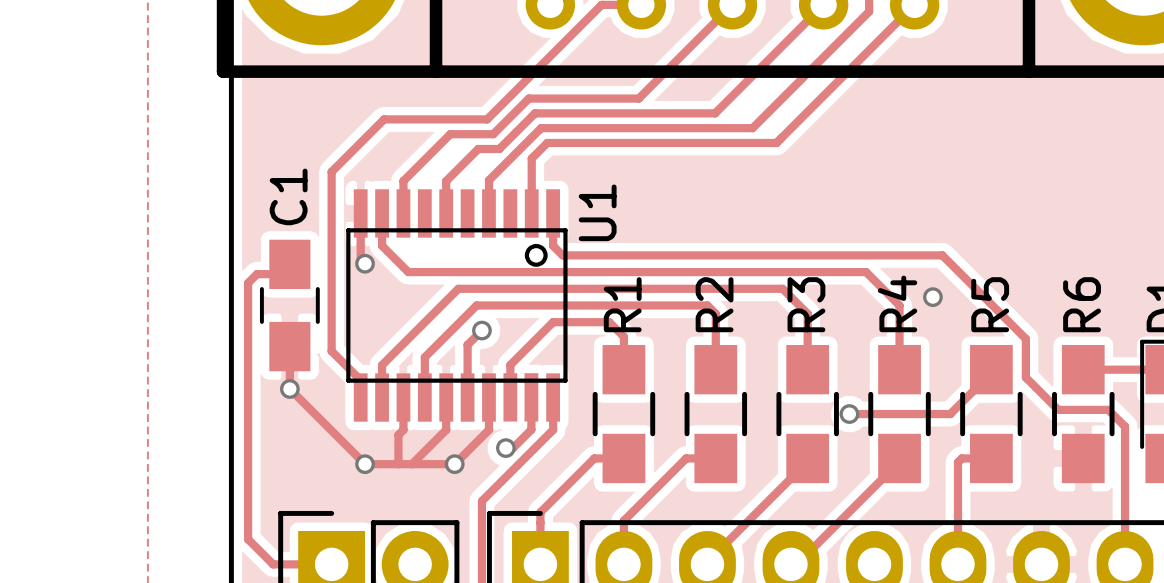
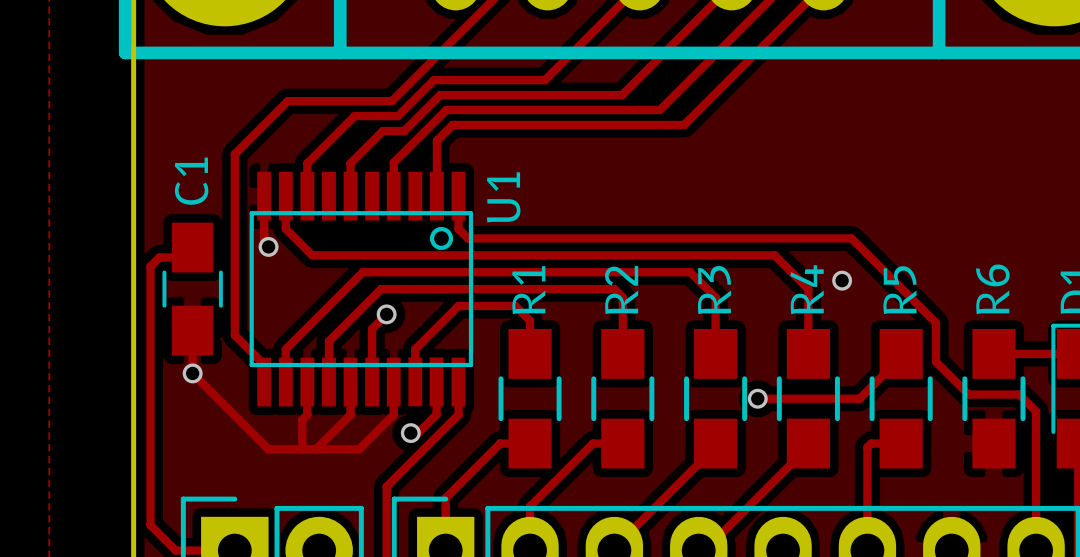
via: (365, 464) -> none
via: (454, 464) -> none

